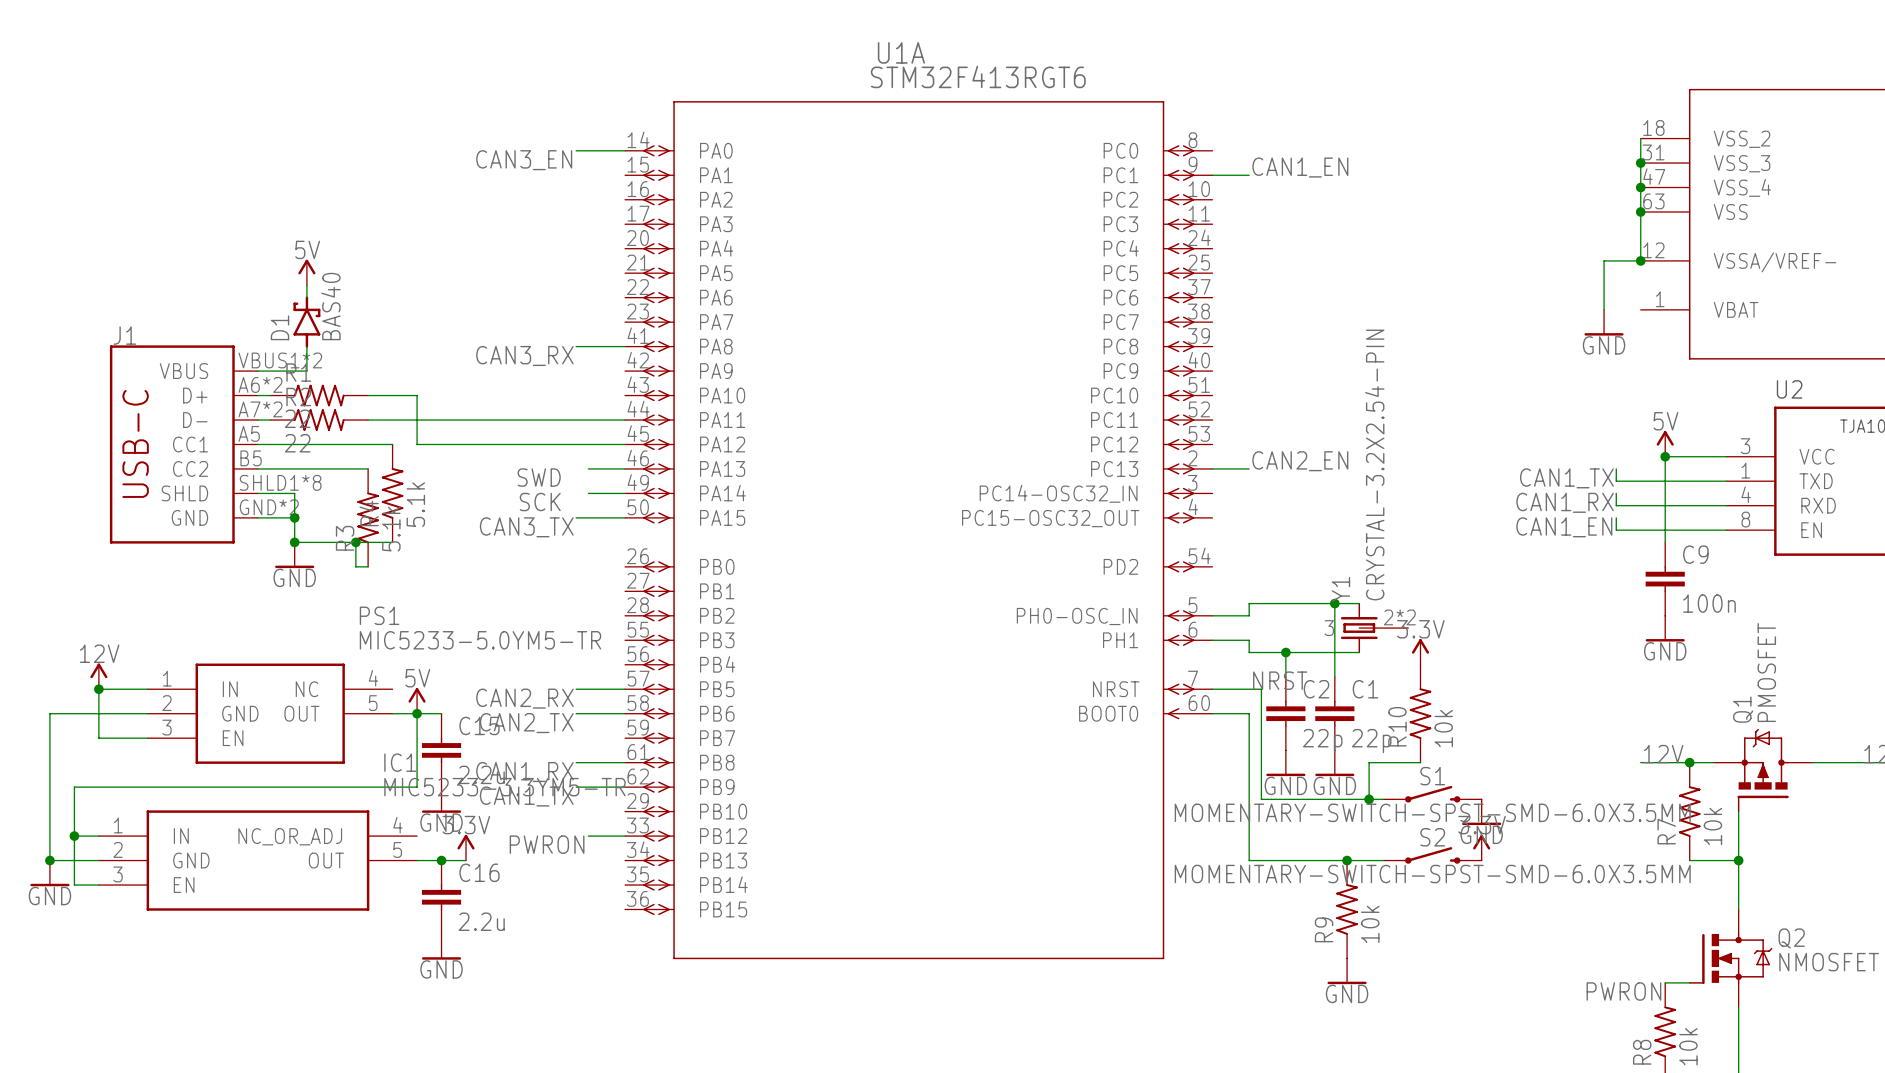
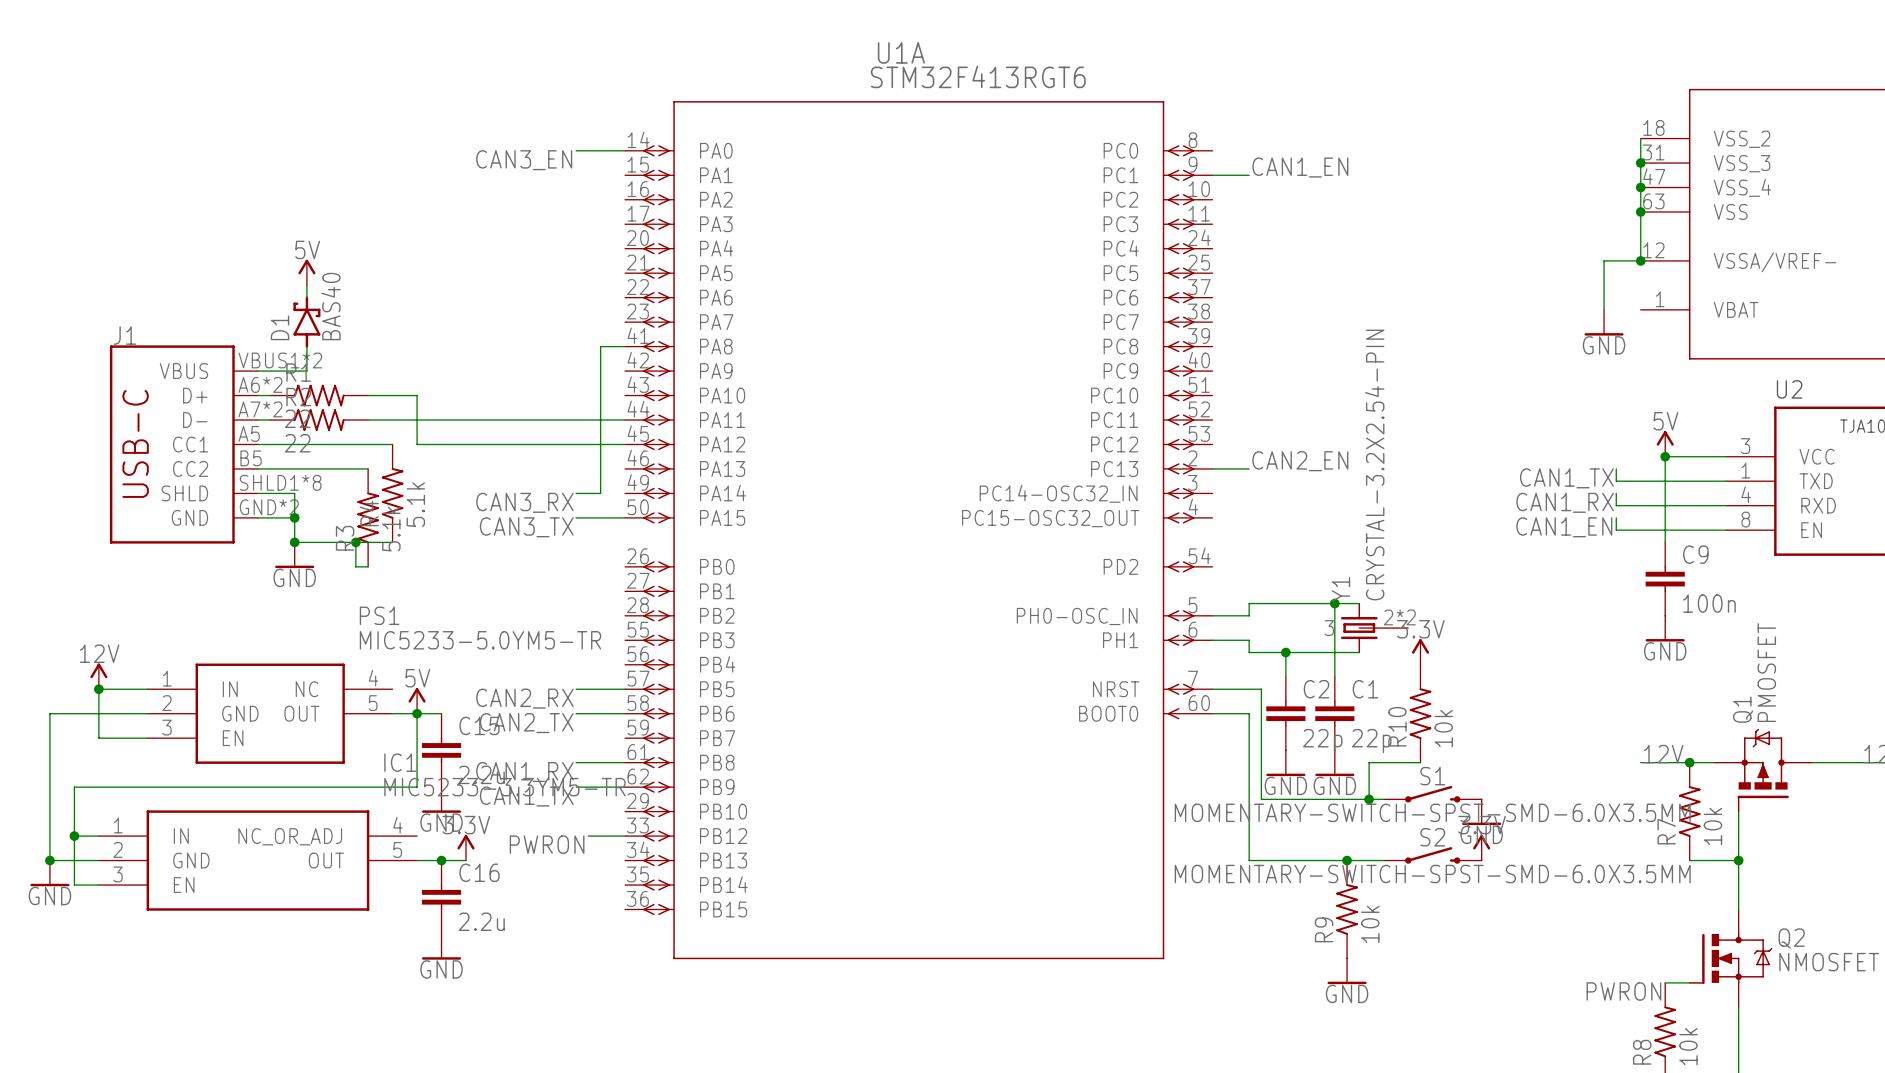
wire: (576, 346) (600, 346) -> (600, 493) (600, 346)
label position: CAN3_RX (524, 355) -> CAN3_RX (524, 502)
wire: (588, 468) (625, 468) -> none
label: SWD (539, 477) -> none
wire: none -> (576, 493) (588, 493)
wire: (600, 493) (625, 493) -> none
label: SCK (540, 502) -> none
label: NRST (1280, 680) -> none

